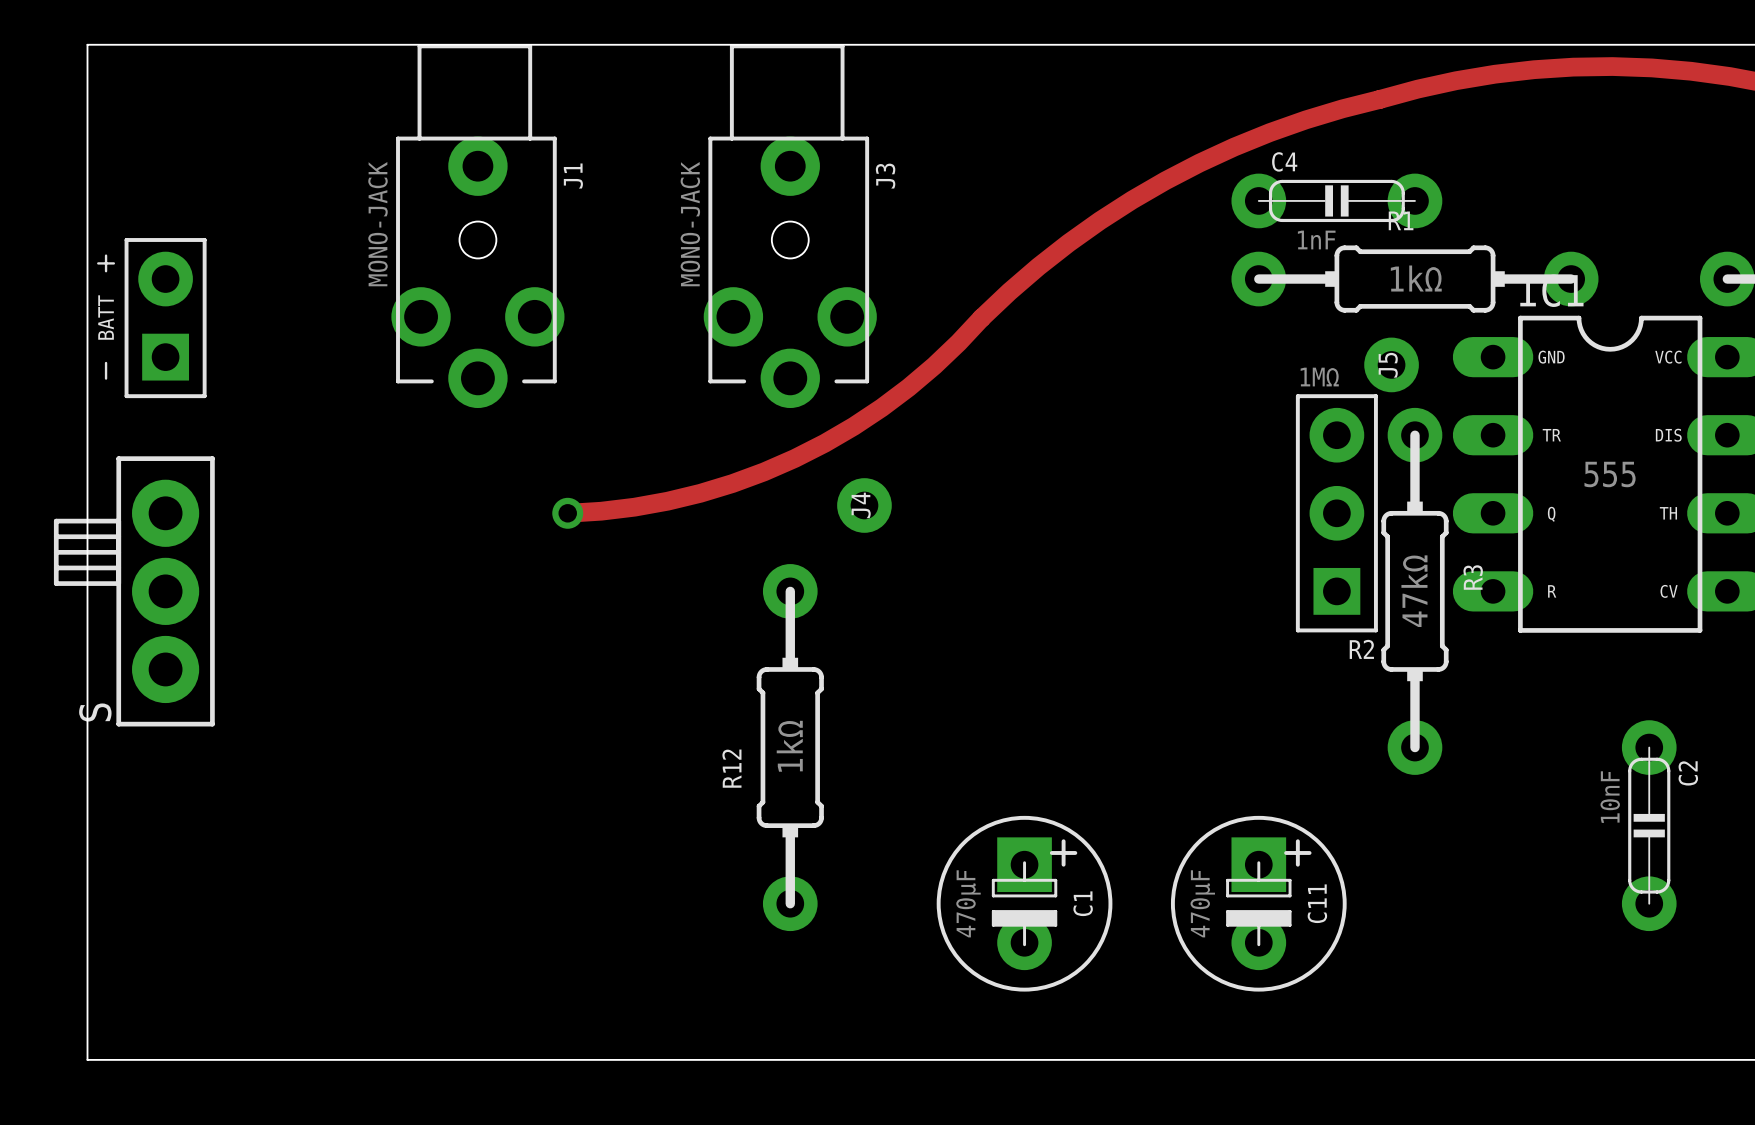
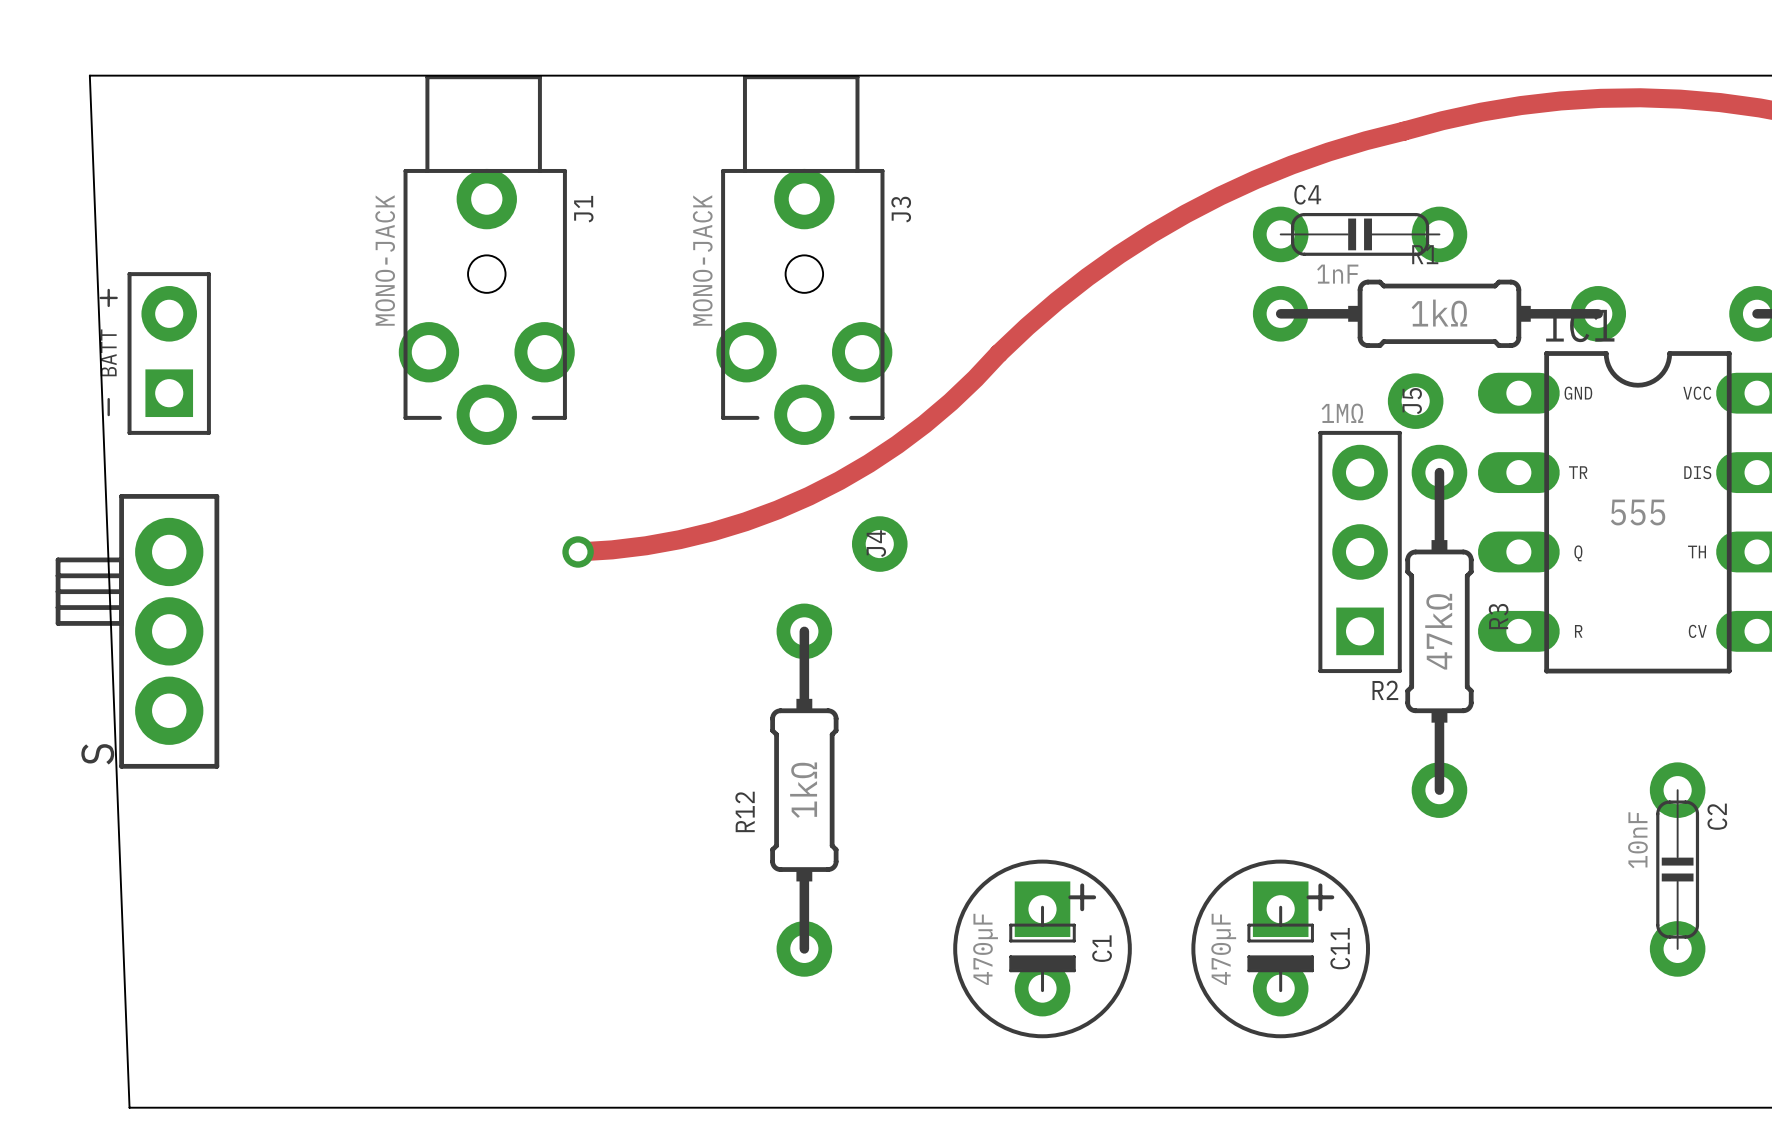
board edge: (87, 44) (87, 1059) (126, 1059) -> (89, 75) (129, 1107)

